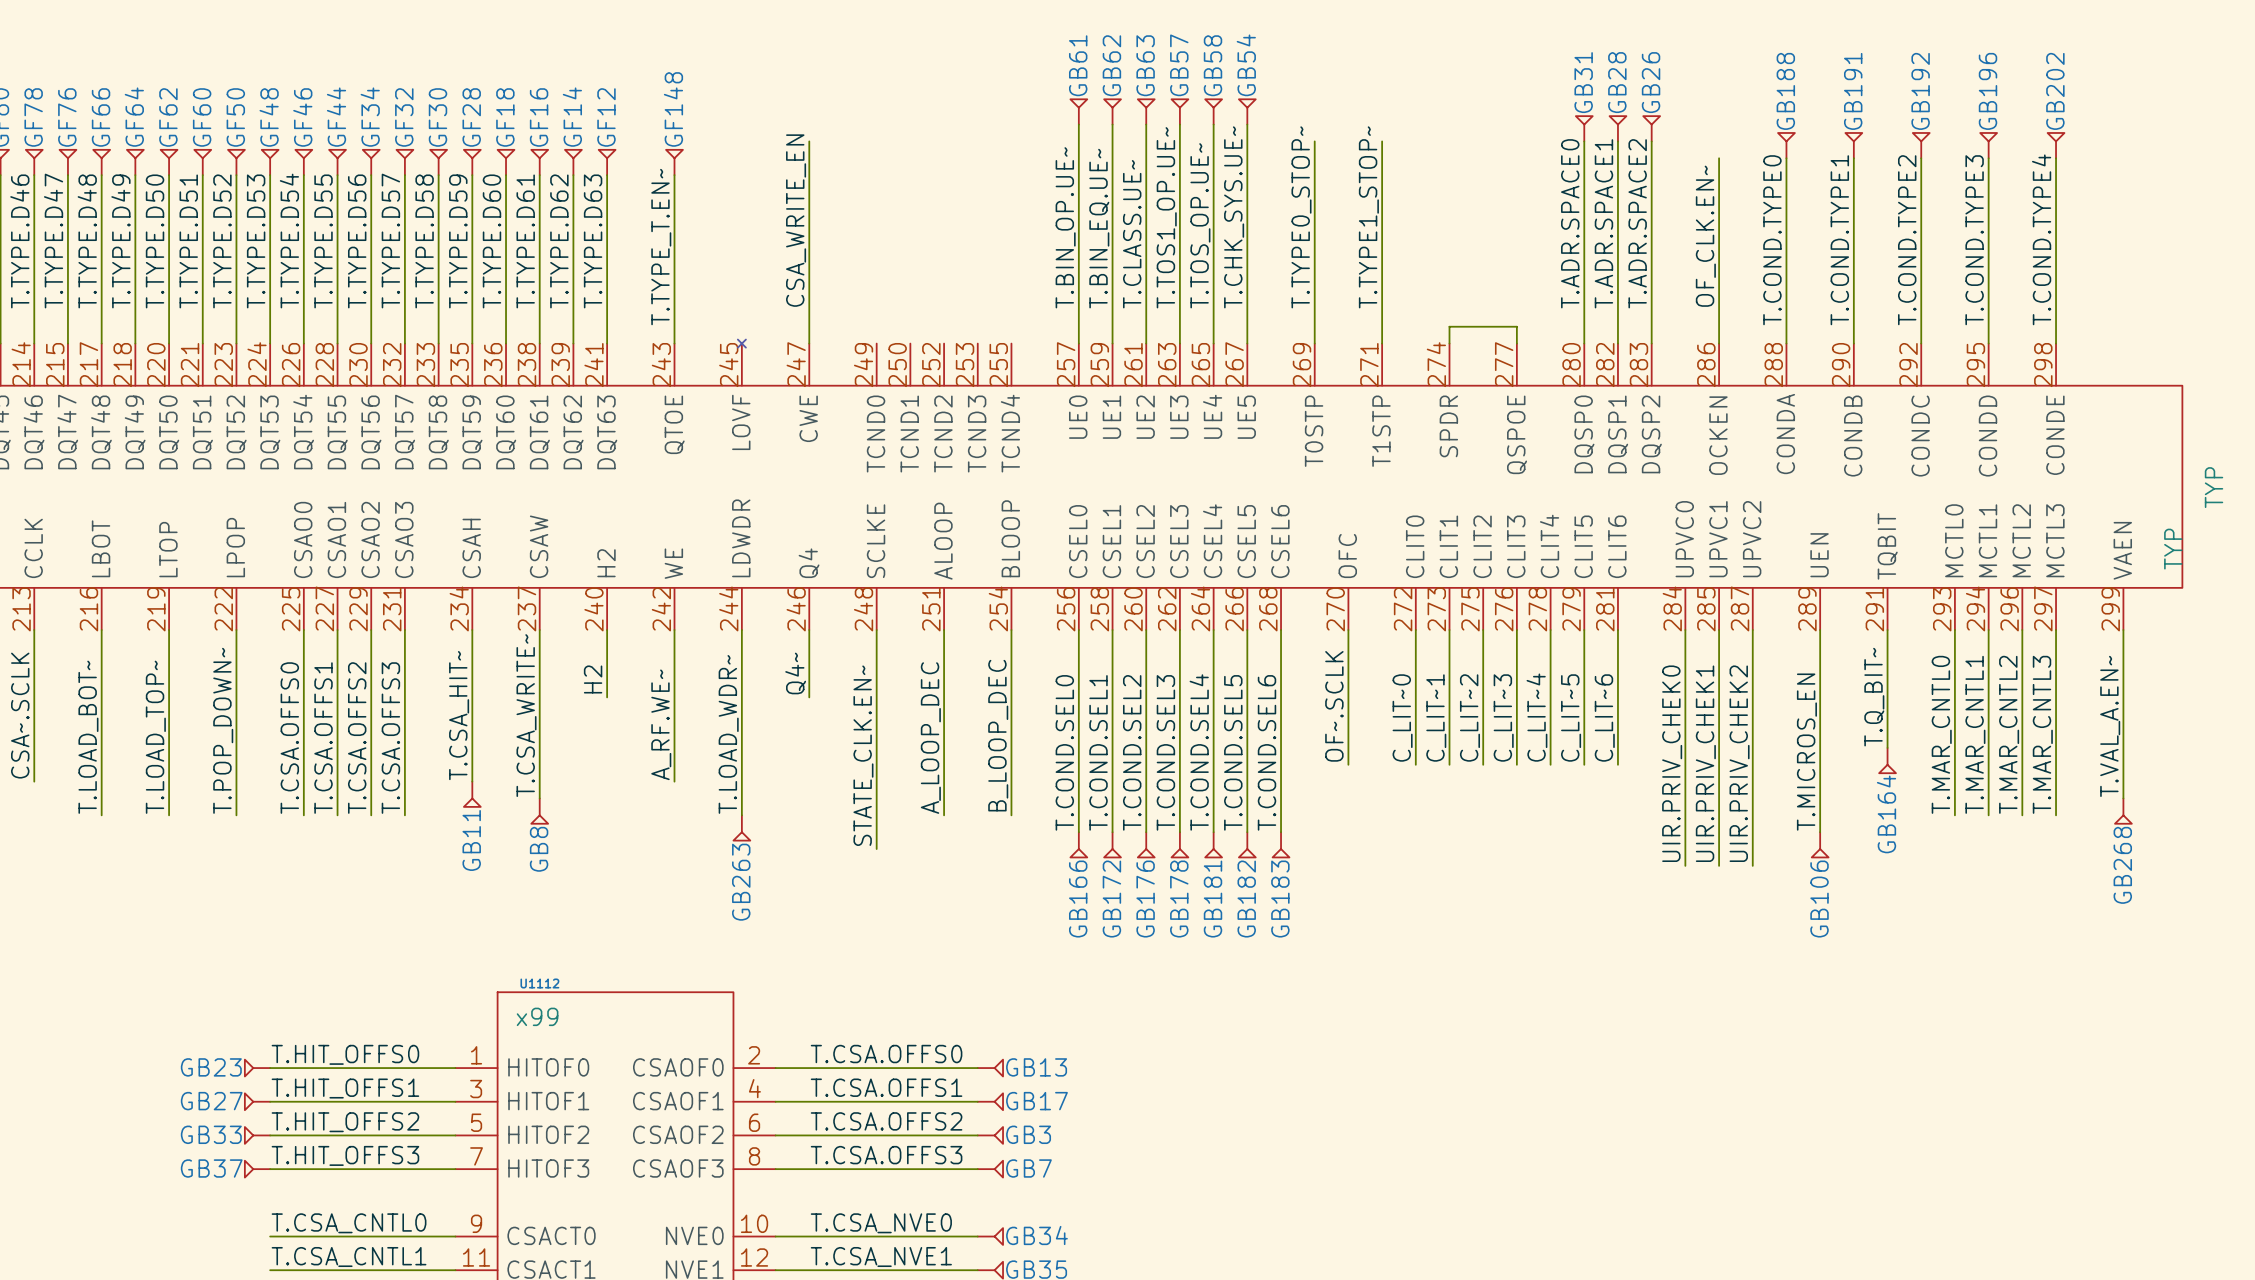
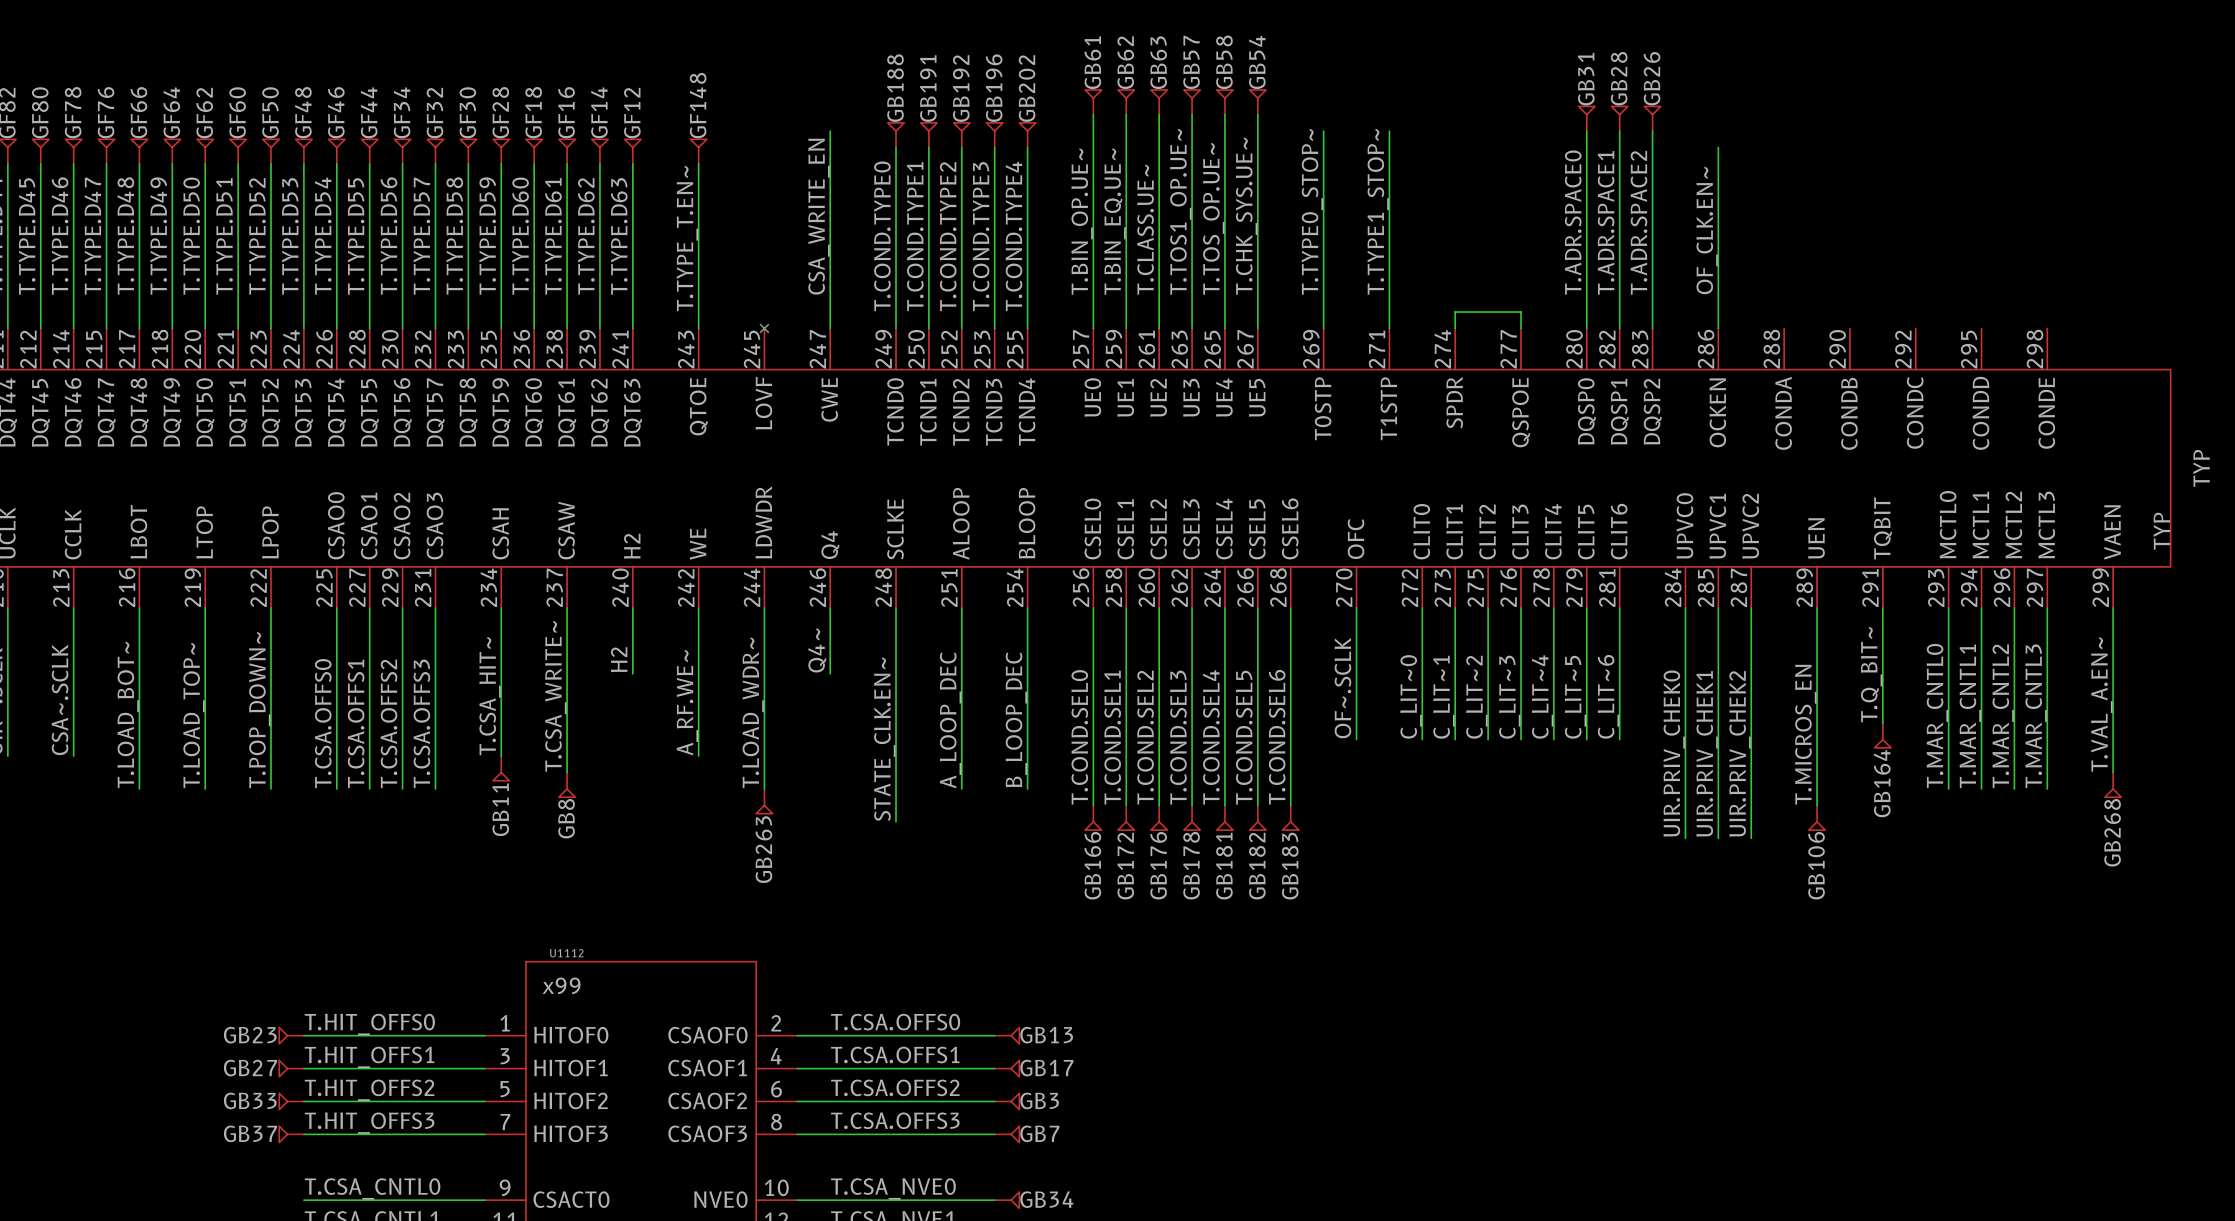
GB188 position: (1786, 145) -> (896, 134)
GB191 position: (1853, 145) -> (928, 134)
GB192 position: (1921, 145) -> (961, 134)
GB196 position: (1988, 145) -> (994, 134)
GB202 position: (2056, 145) -> (1027, 134)
wire: none -> (896, 147) (896, 328)
wire: none -> (928, 147) (928, 328)
wire: none -> (961, 147) (961, 328)
wire: none -> (994, 147) (994, 328)
wire: none -> (1027, 147) (1027, 328)
wire: (1786, 158) (1786, 343) -> none
wire: (1853, 158) (1853, 343) -> none
wire: (1921, 158) (1921, 343) -> none
wire: (1988, 158) (1988, 343) -> none
wire: (2056, 158) (2056, 343) -> none
label: none -> T.COND.TYPE4 (1013, 236)
label: T.COND.TYPE4 (2041, 239) -> none
label: none -> T.COND.TYPE0 (882, 236)
label: none -> T.COND.TYPE1 (915, 236)
label: none -> T.COND.TYPE2 (948, 236)
label: none -> T.COND.TYPE3 (981, 236)
label: T.COND.TYPE0 (1772, 240) -> none
label: T.COND.TYPE1 (1839, 240) -> none
label: T.COND.TYPE2 (1907, 240) -> none
label: T.COND.TYPE3 (1974, 240) -> none

